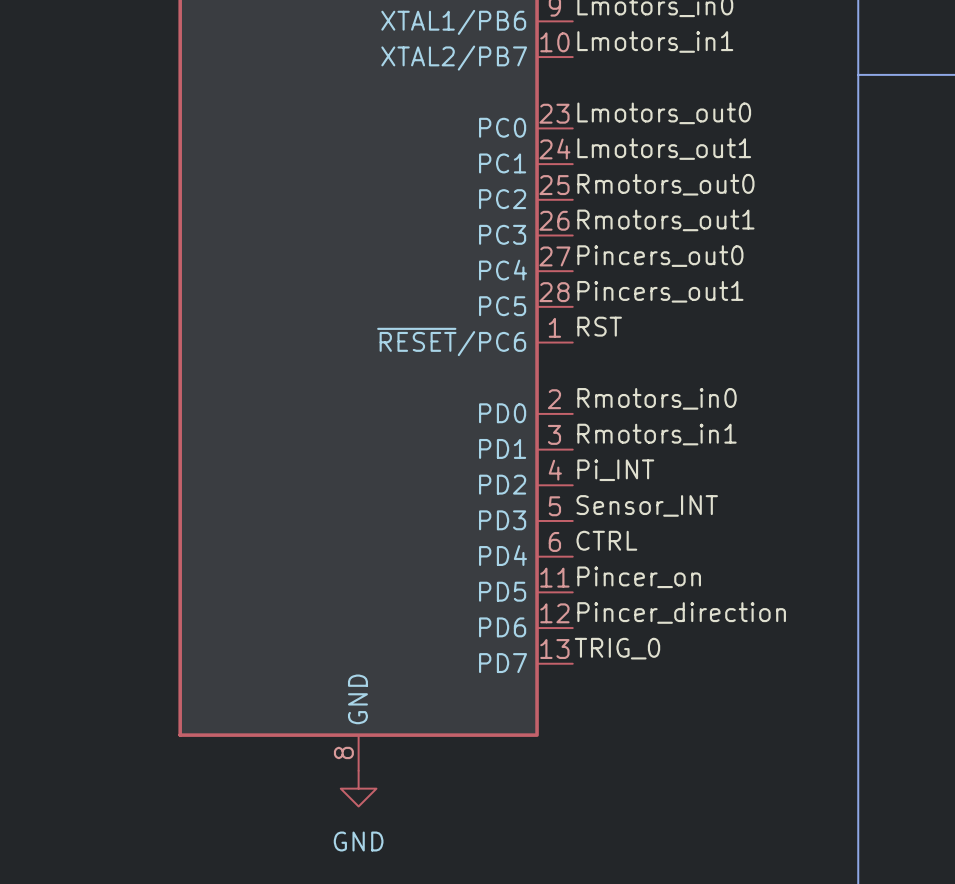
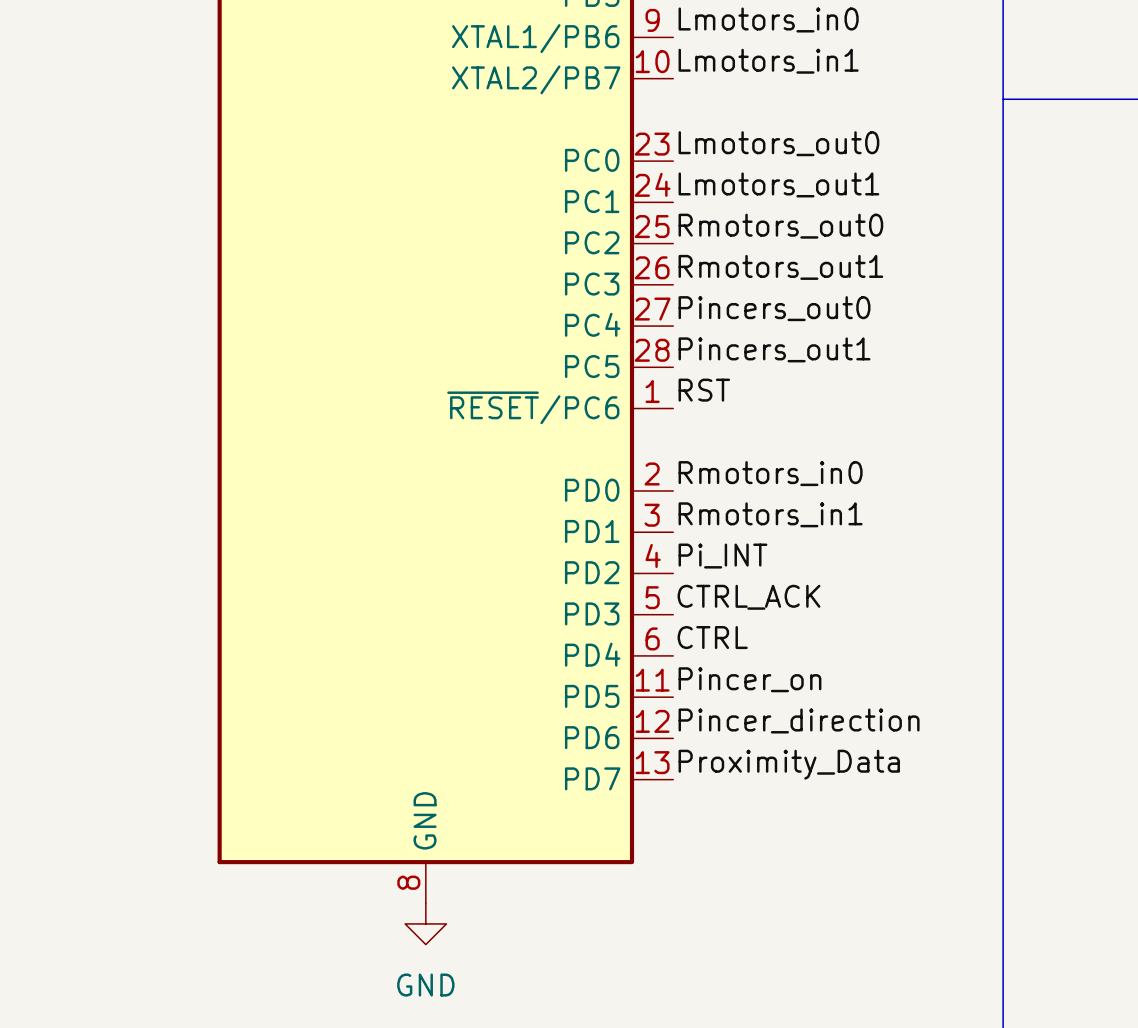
label: Sensor_INT (647, 505) -> CTRL_ACK (748, 597)
label: TRIG_0 (617, 648) -> Proximity_Data (789, 764)

